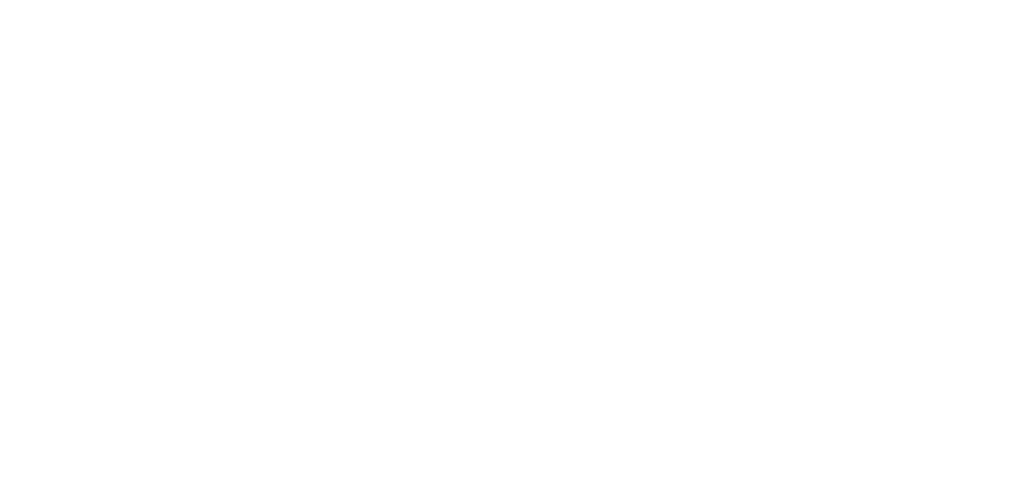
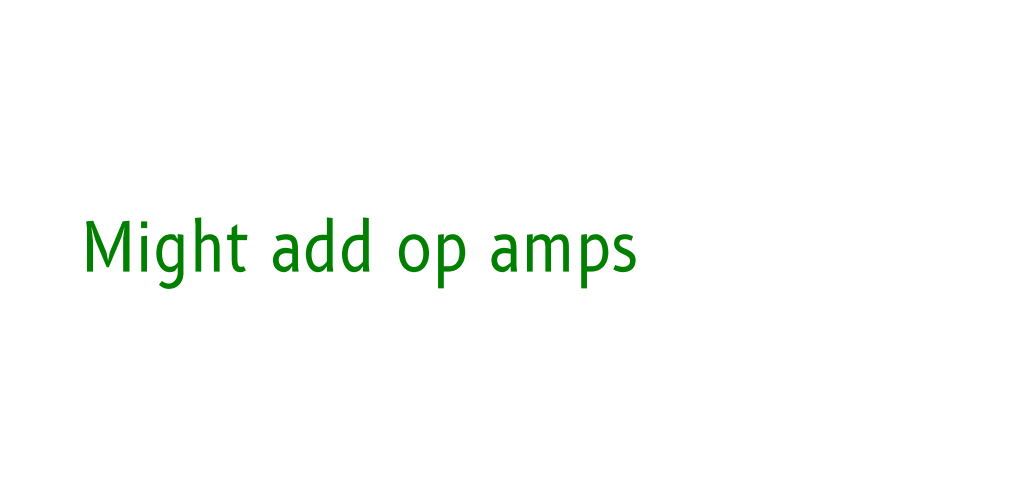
text: none -> Might add op amps (360, 253)

